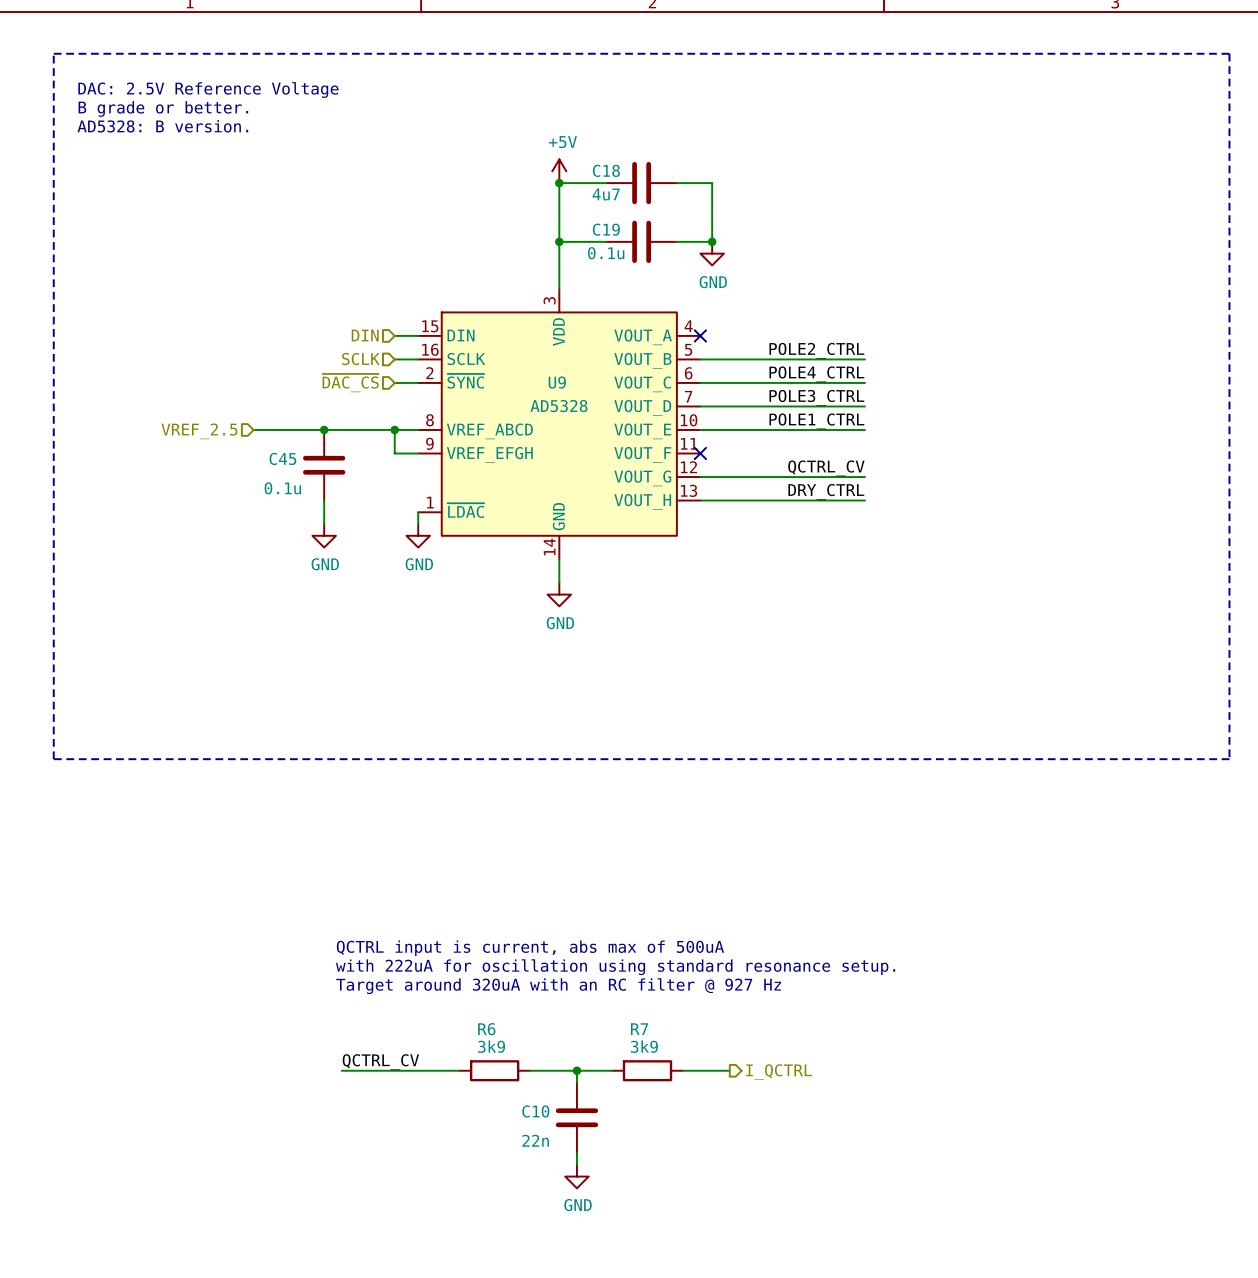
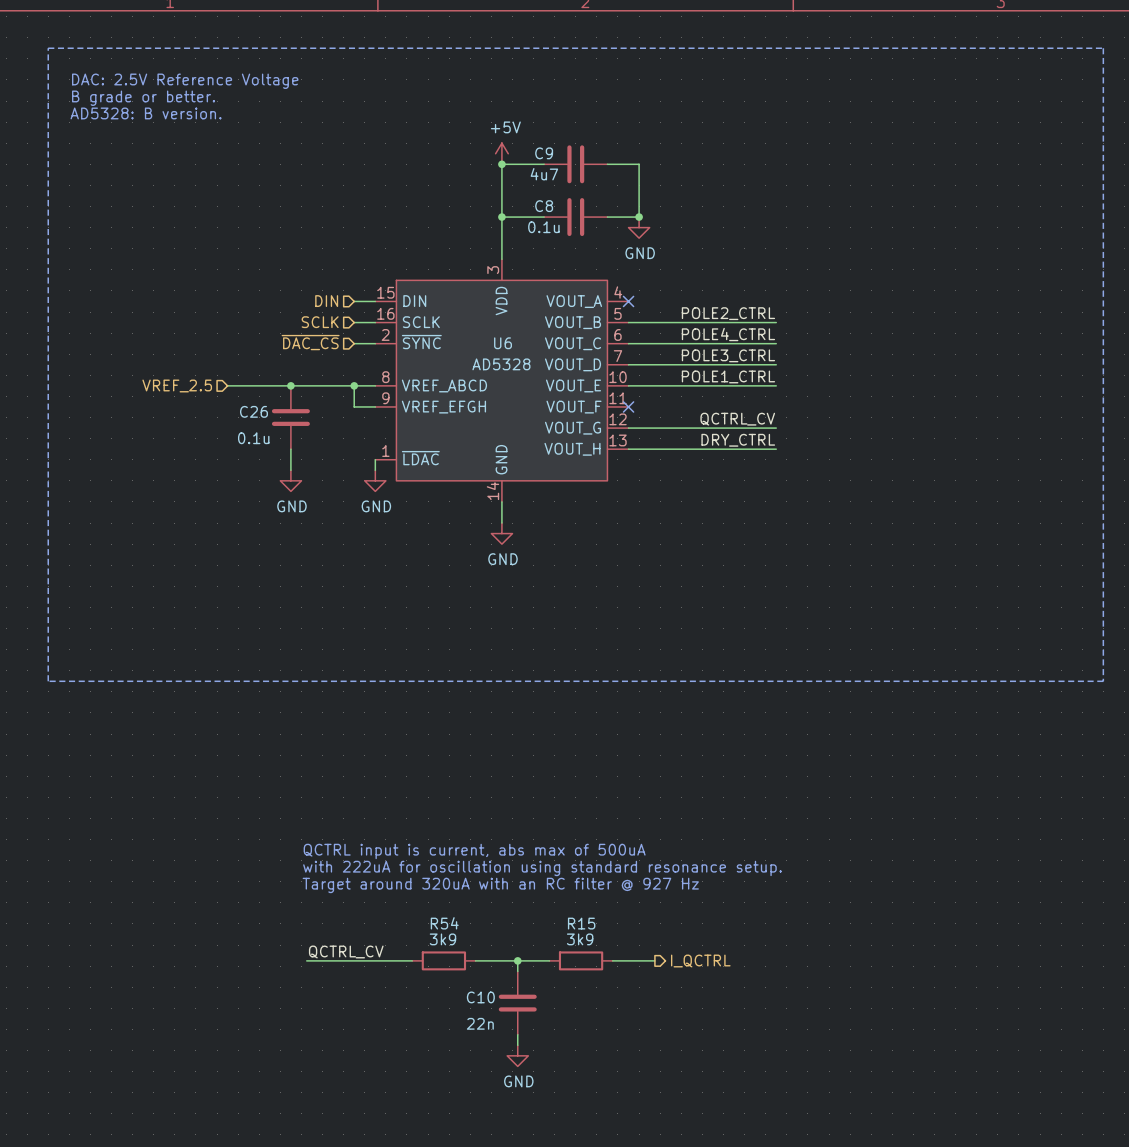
C18 name: C18 (606, 170) -> C9 (544, 153)
C19 name: C19 (606, 229) -> C8 (544, 206)
U9 name: U9 (557, 382) -> U6 (503, 343)
C45 name: C45 (282, 458) -> C26 (253, 411)
R6 name: R6 (486, 1029) -> R54 (444, 923)
R7 name: R7 (639, 1029) -> R15 (581, 923)

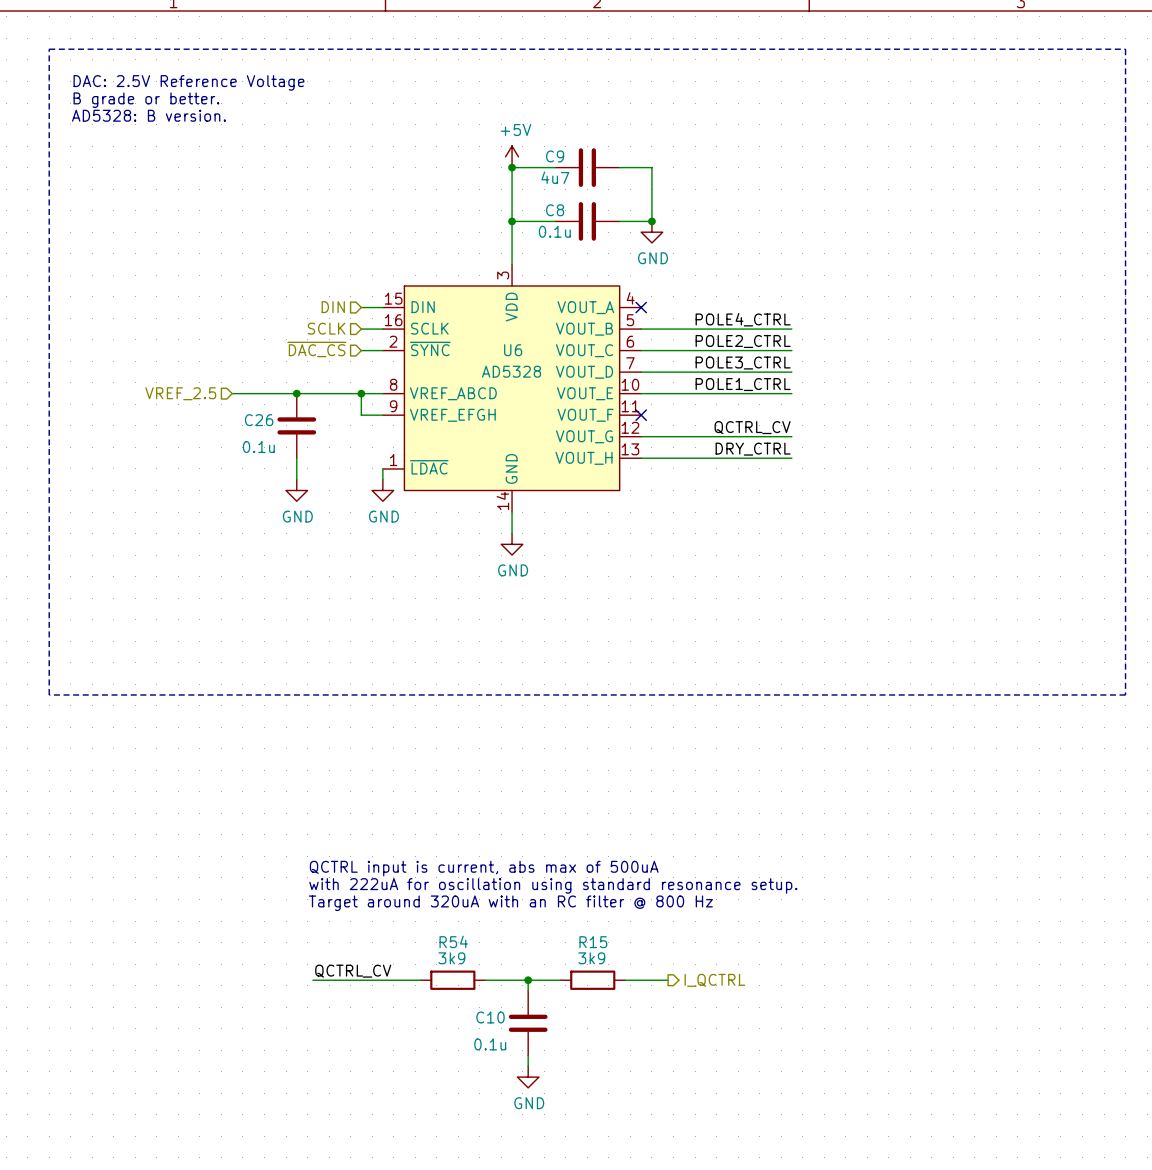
label: POLE2_CTRL (728, 313) -> POLE4_CTRL (743, 319)
label: POLE4_CTRL (728, 334) -> POLE2_CTRL (743, 341)
text: Target around 320uA with an RC filter @ 927 Hz (500, 885) -> Target around 320uA with an RC filter @ 800 Hz (510, 903)
C10 value: 22n (480, 1023) -> 0.1u (490, 1044)

